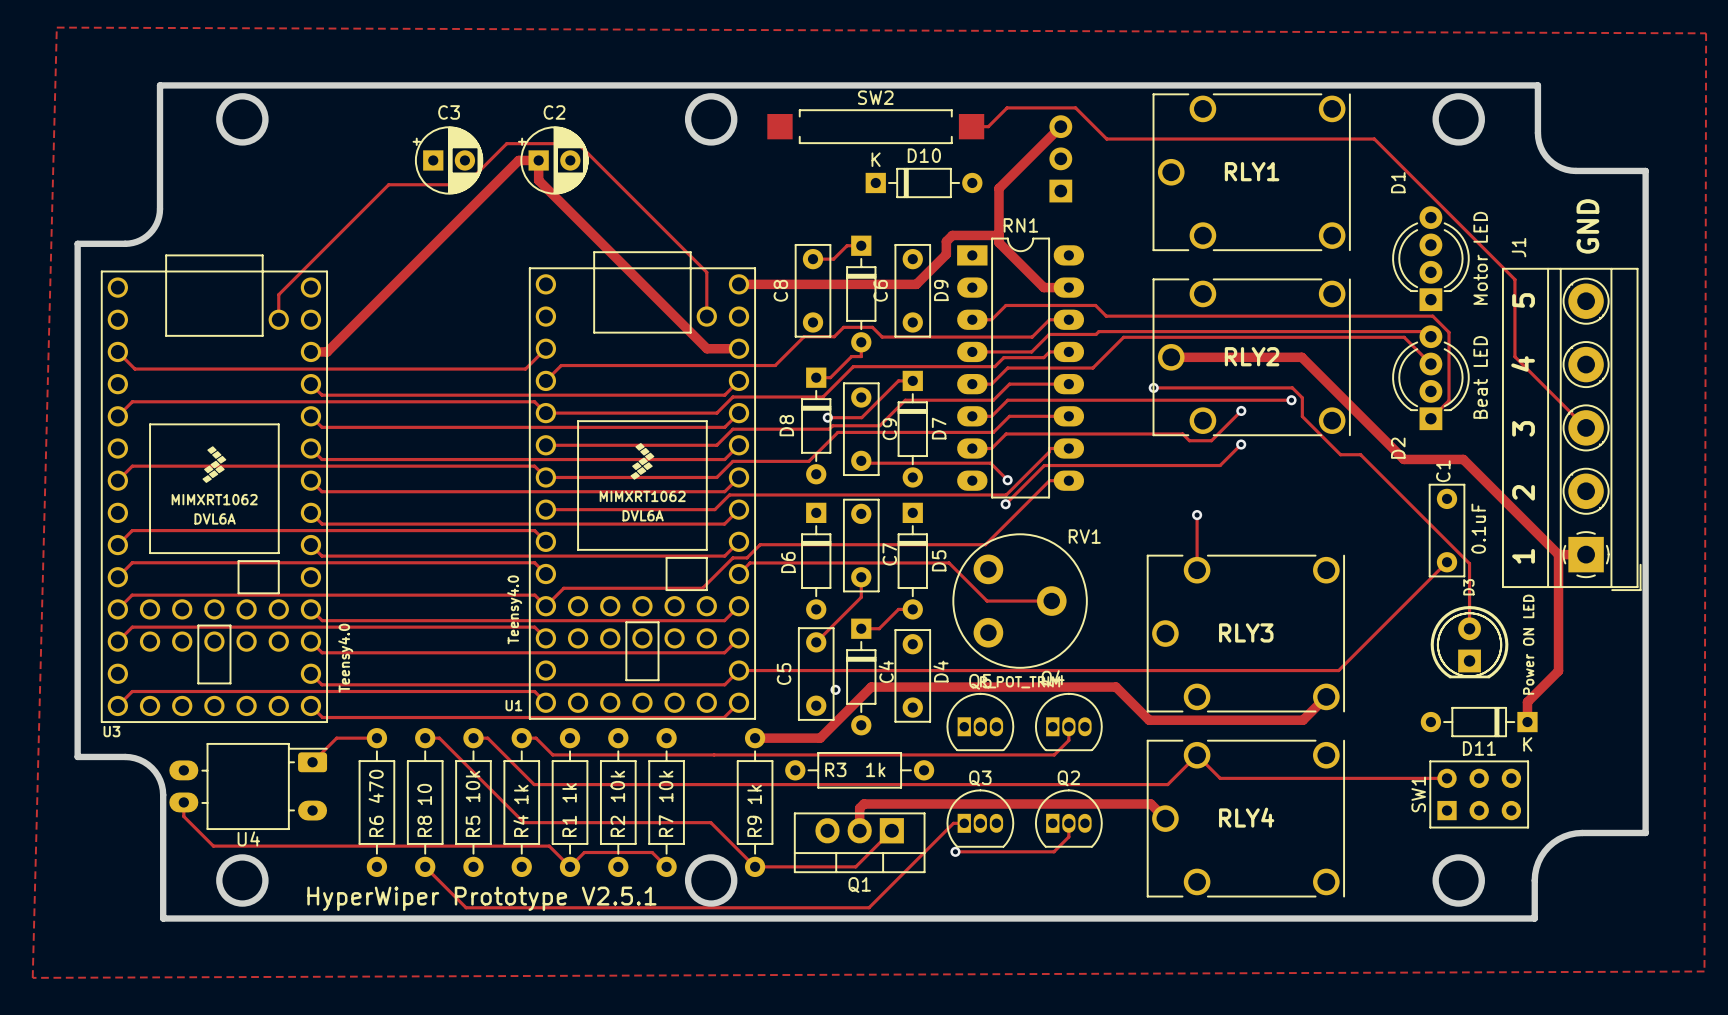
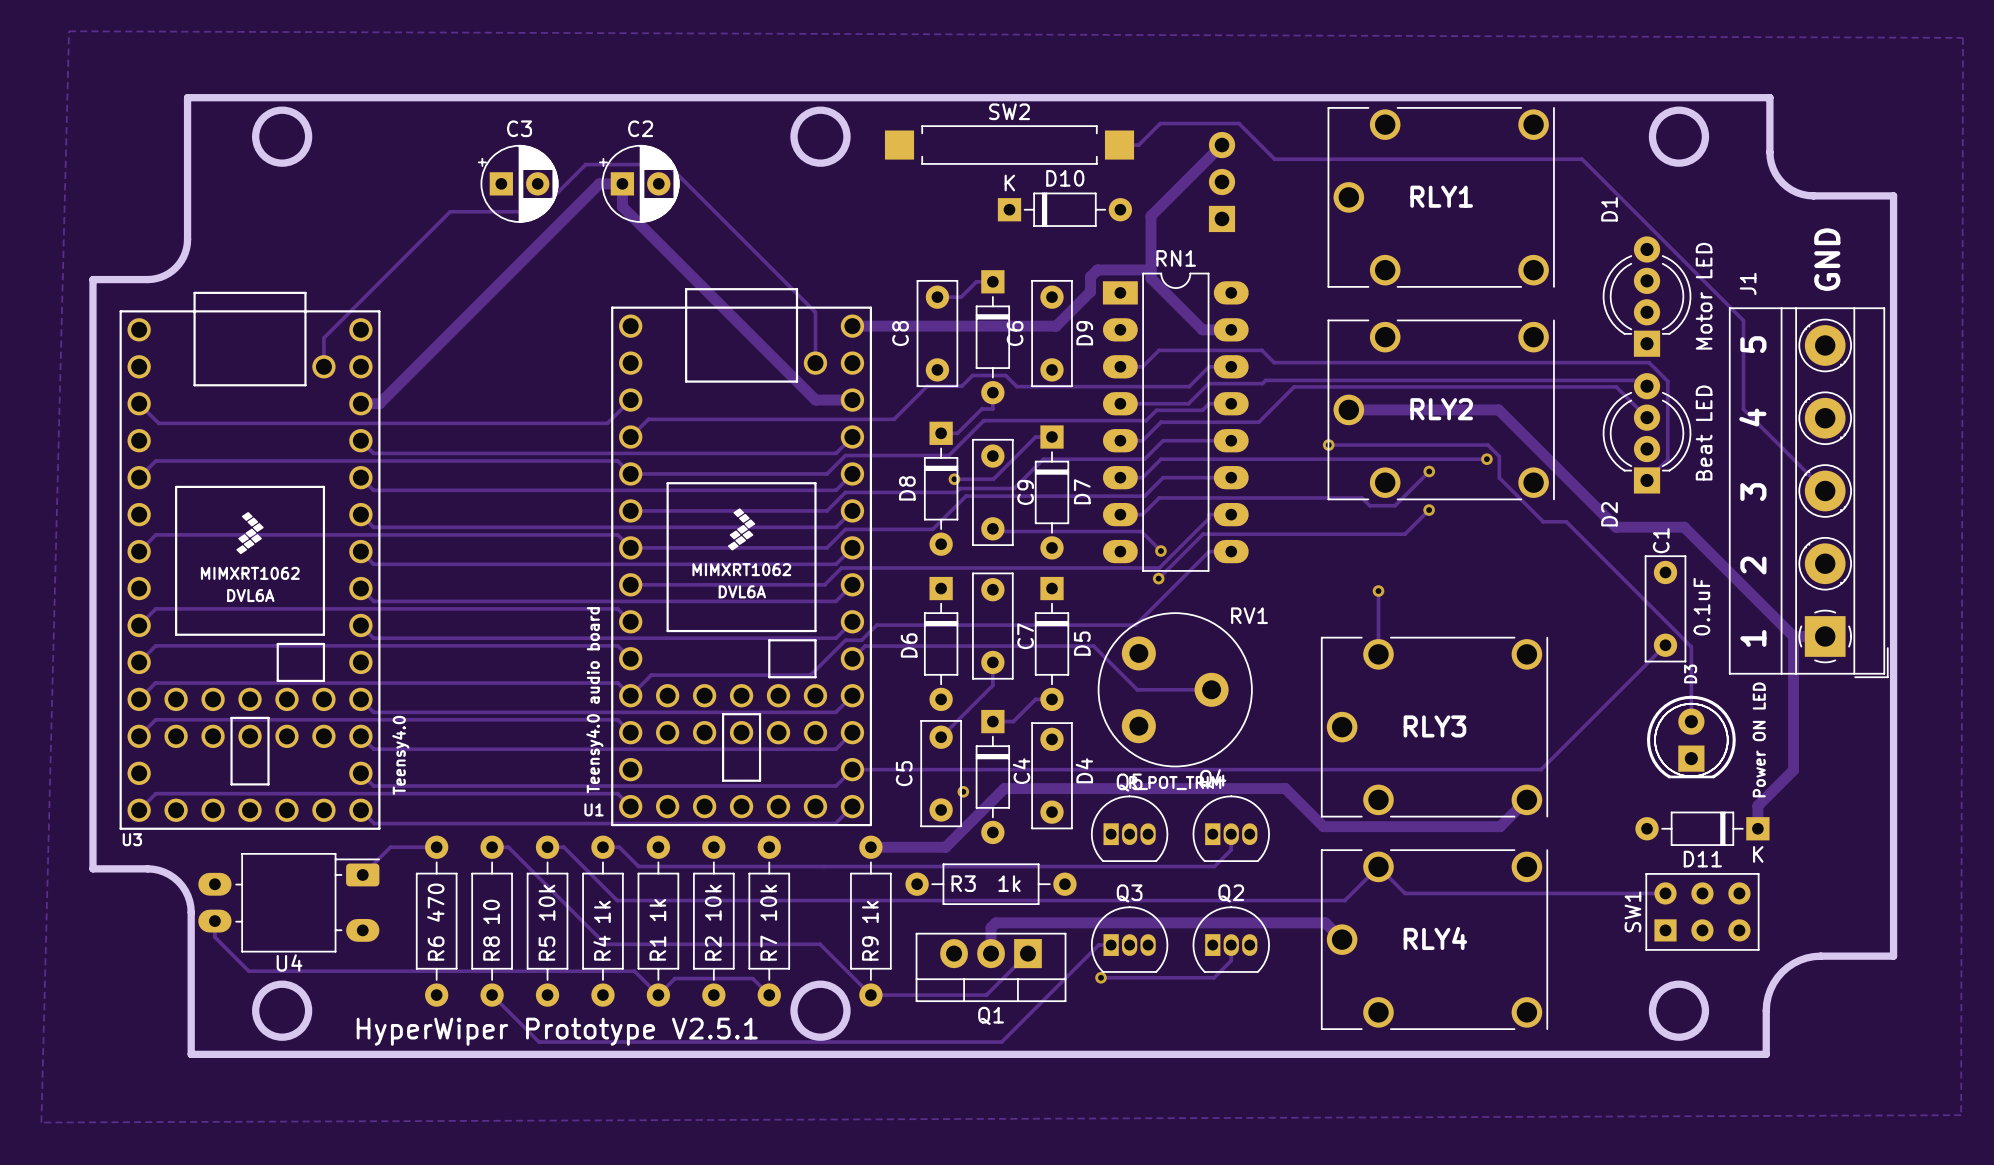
U1 value: Teensy4.0 (514, 609) -> Teensy4.0 audio board (594, 700)

